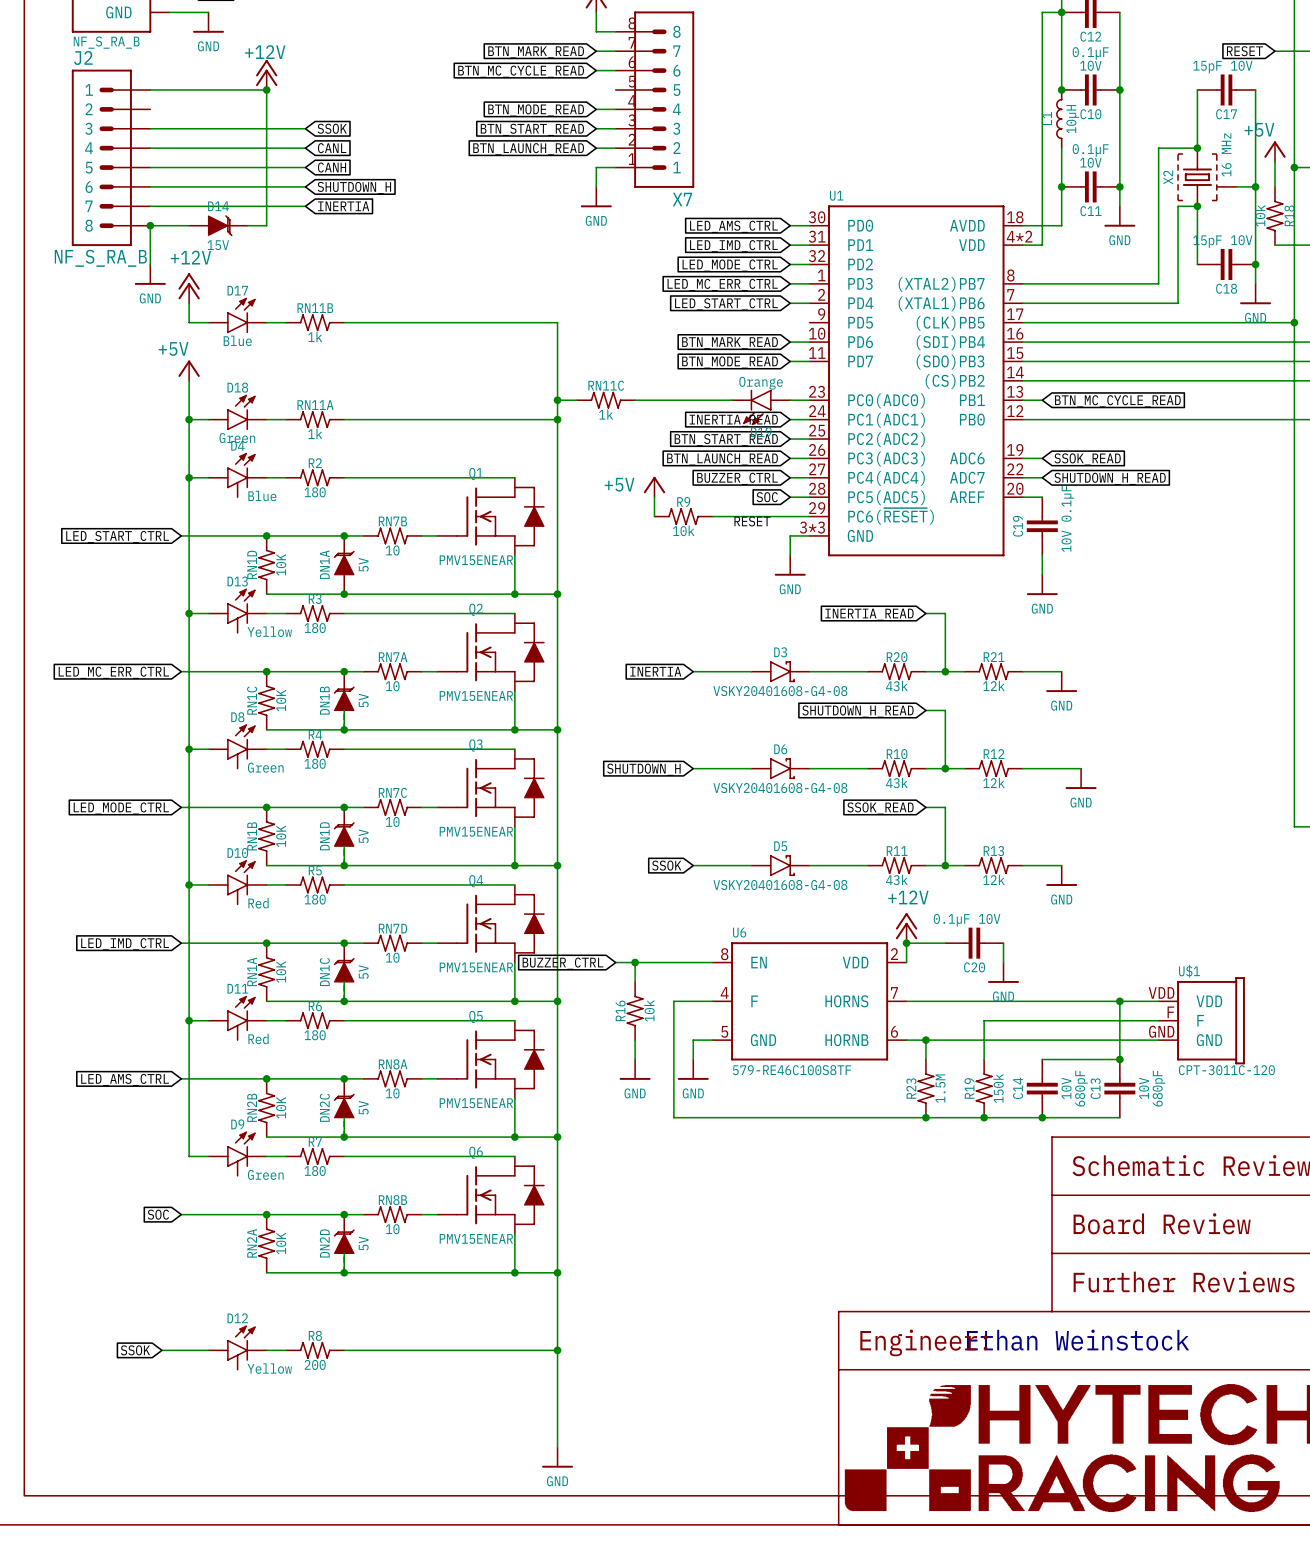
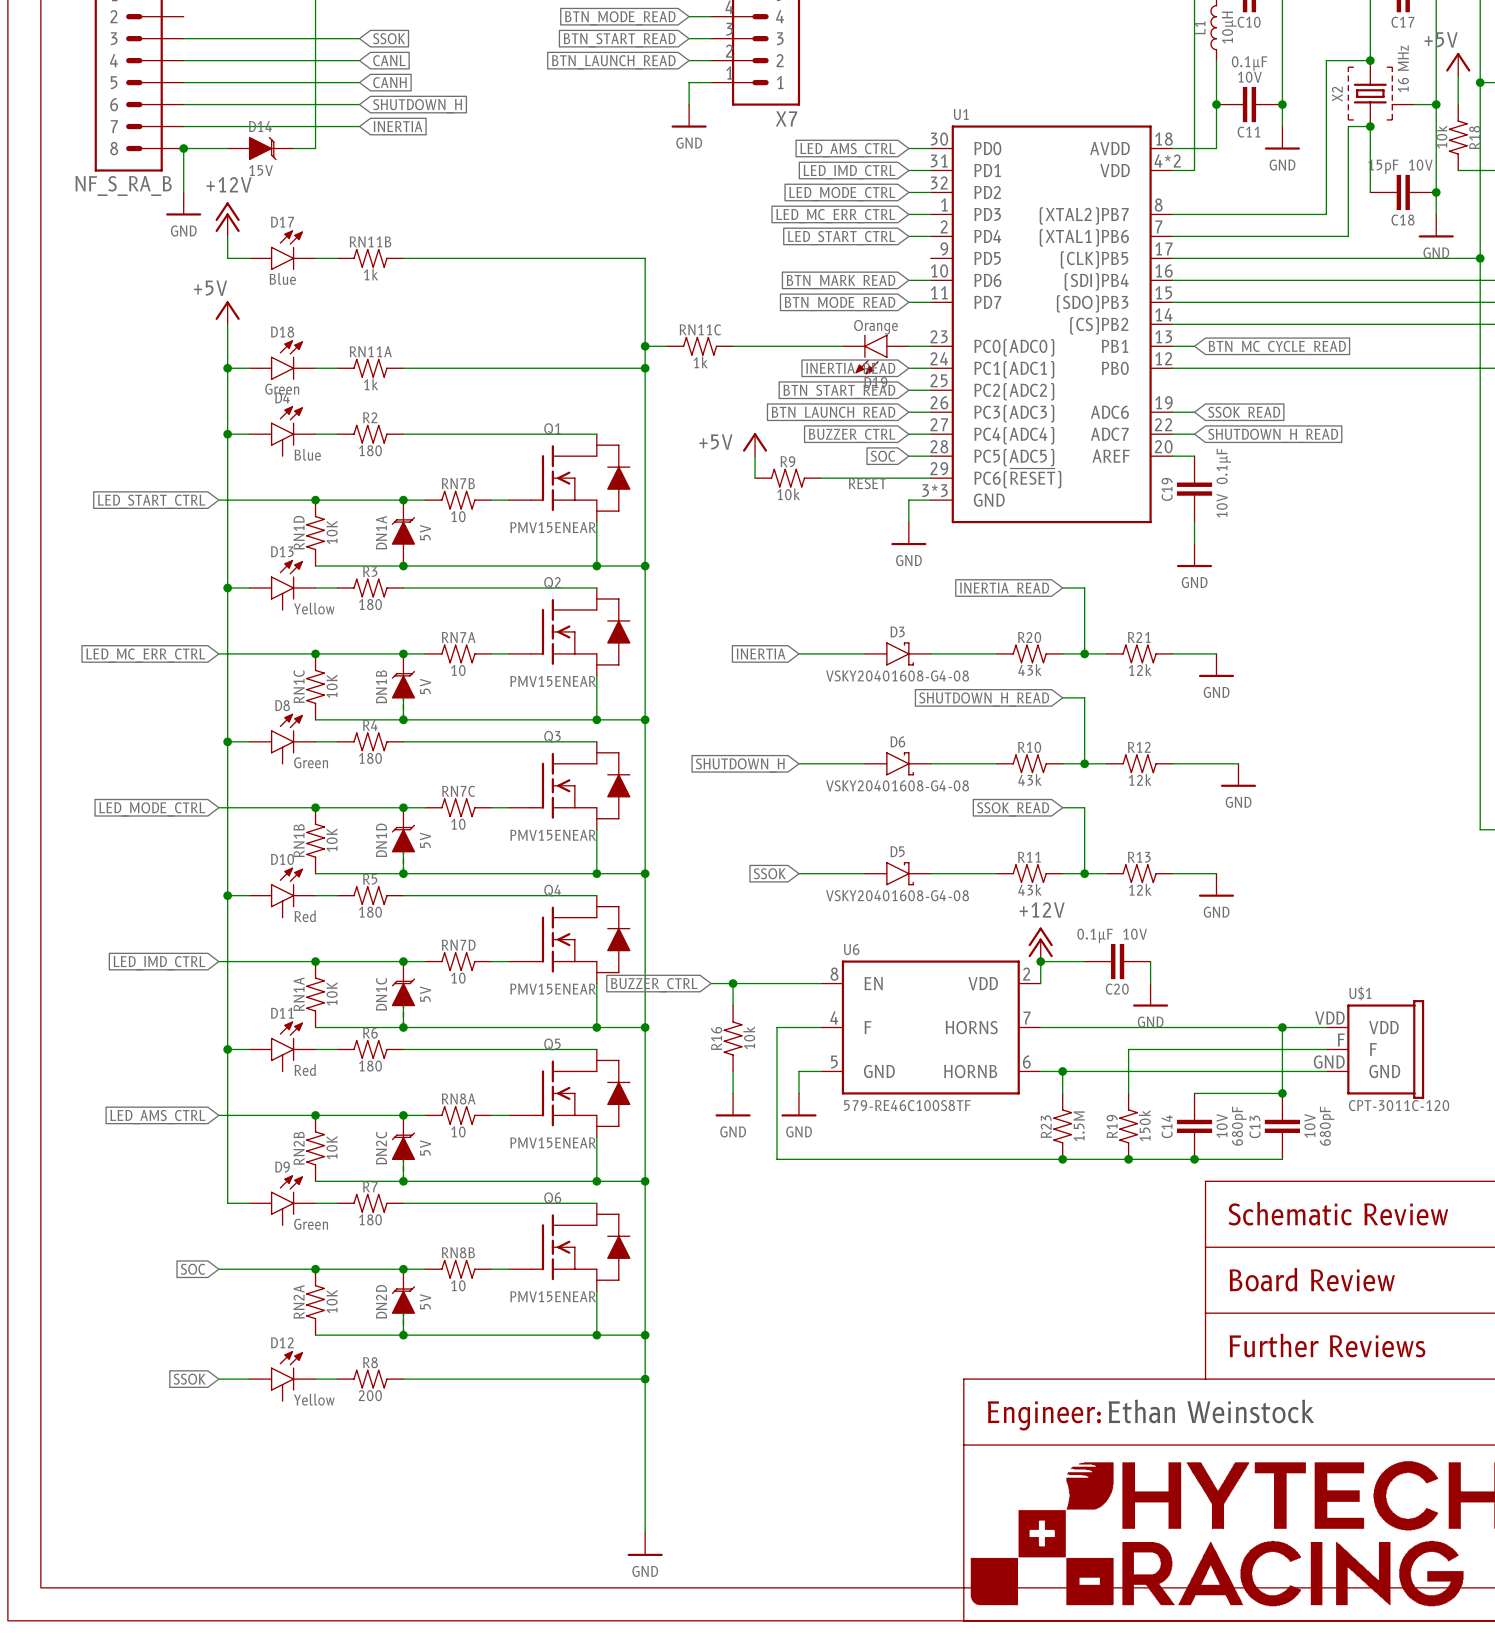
wire: none -> (218, 1379) (249, 1379)
D12 position: (237, 1347) -> (282, 1376)
global label position: SSOK (135, 1350) -> SSOK (189, 1379)
wire: (161, 1350) (208, 1350) -> none
wire: (266, 1350) (286, 1350) -> (315, 1379) (337, 1379)
R8 position: (315, 1350) -> (370, 1379)
wire: (344, 1350) (557, 1350) -> (403, 1379) (645, 1379)
junction position: (557, 1350) -> (645, 1379)

